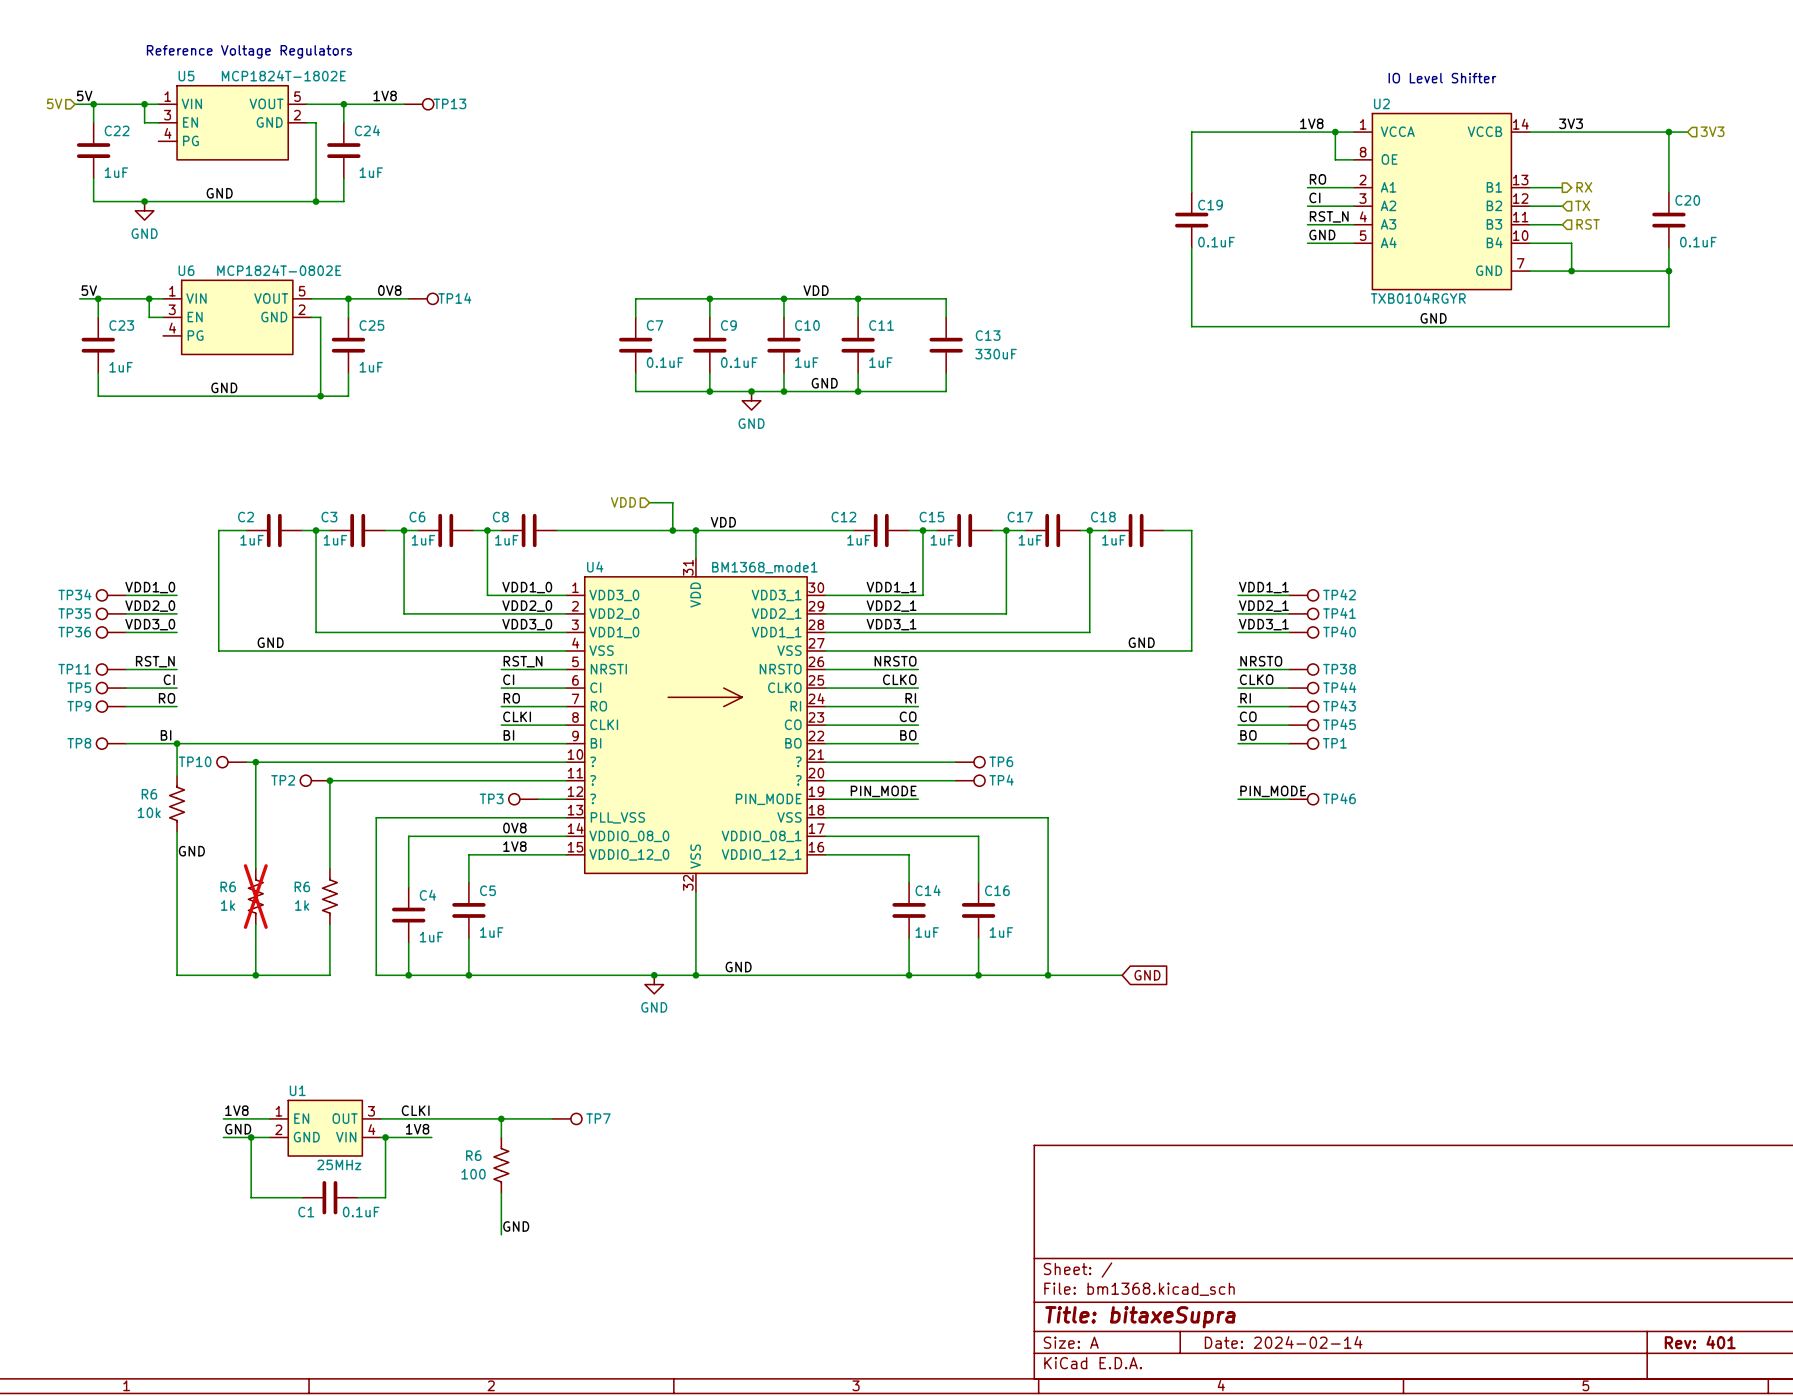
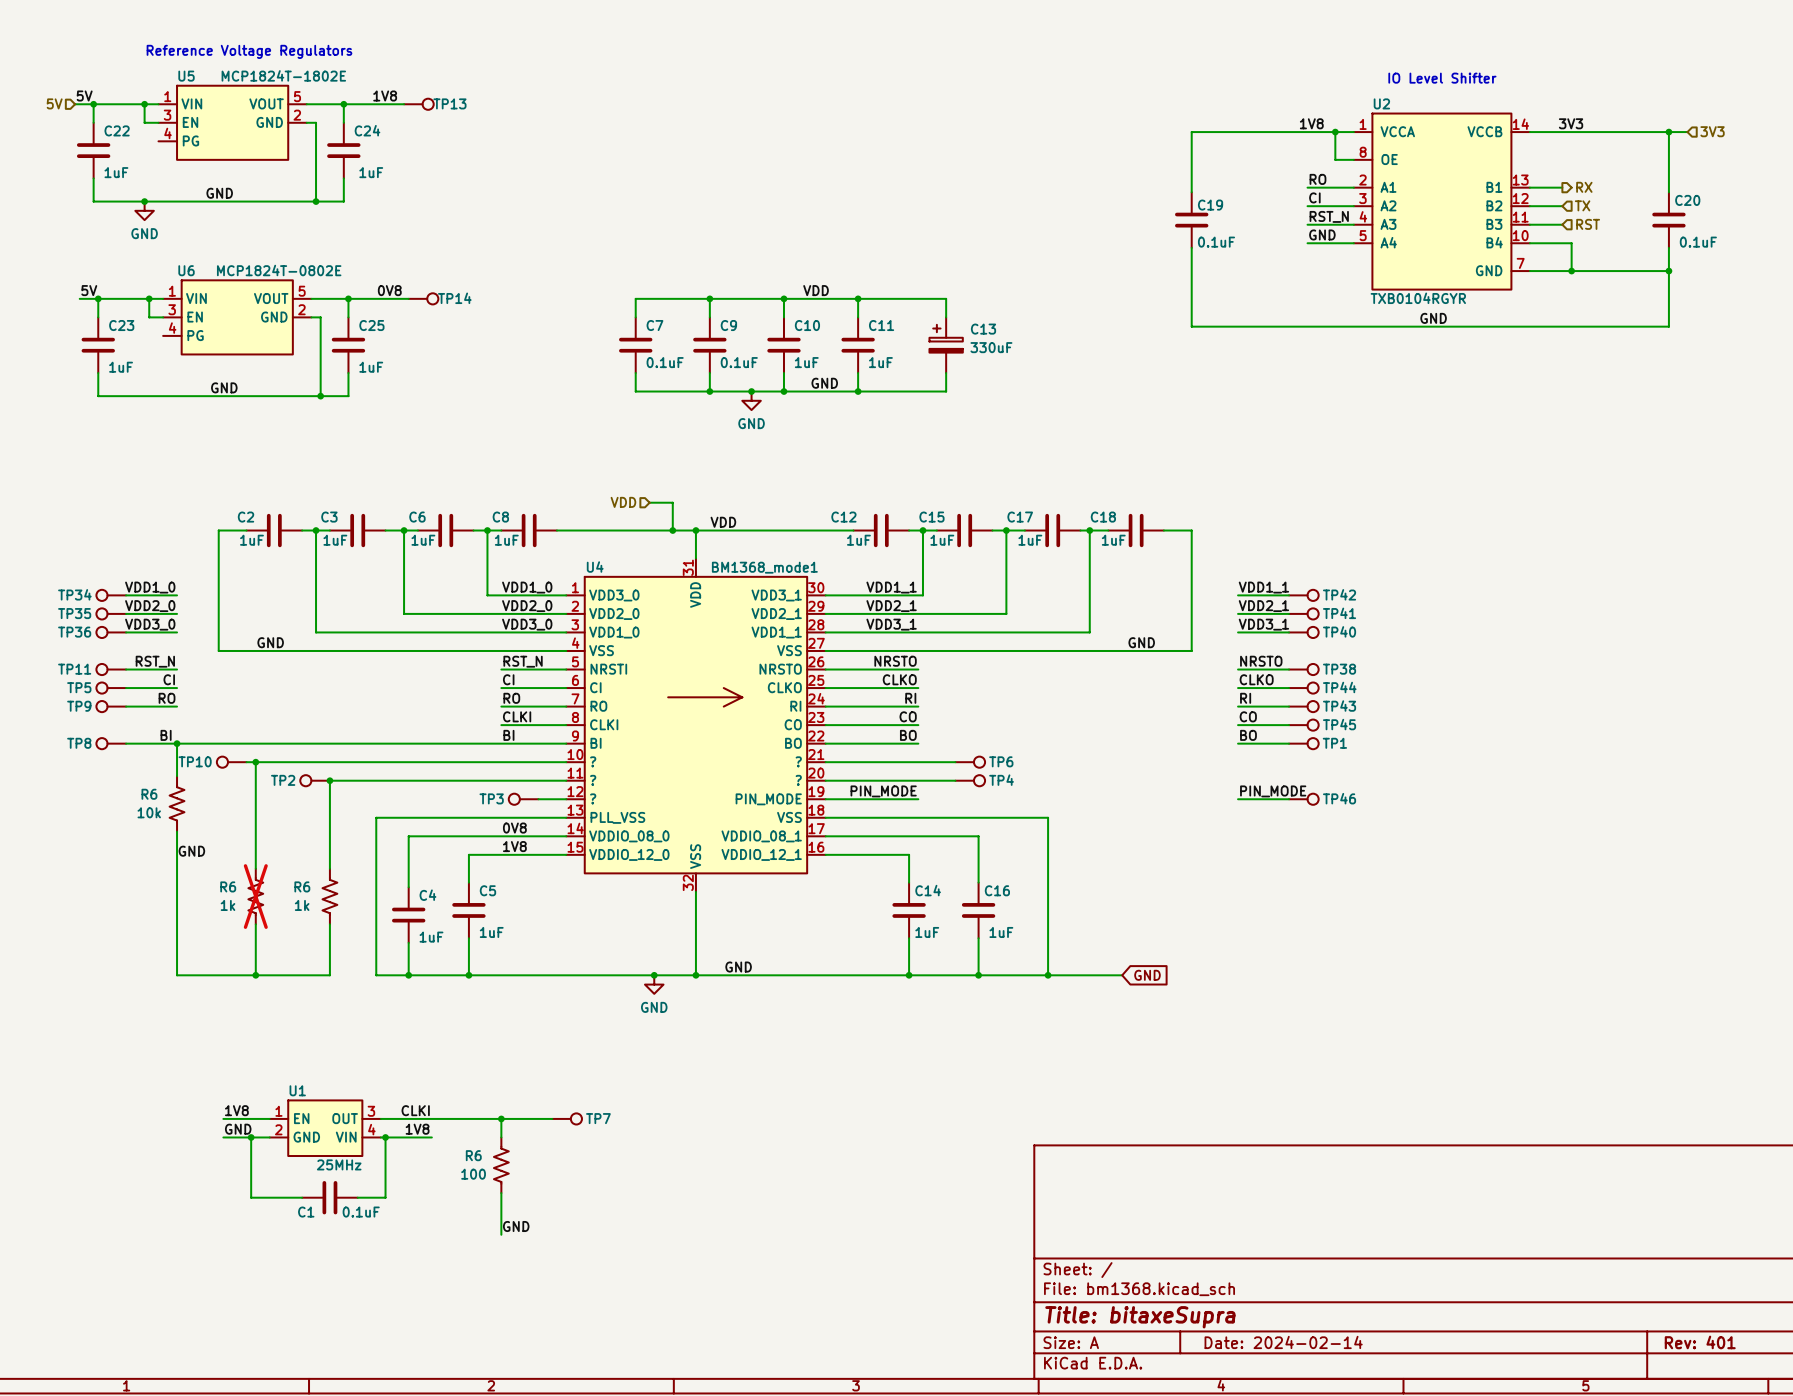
C13 symbol: [929, 317, 963, 373] -> [929, 317, 963, 373]

